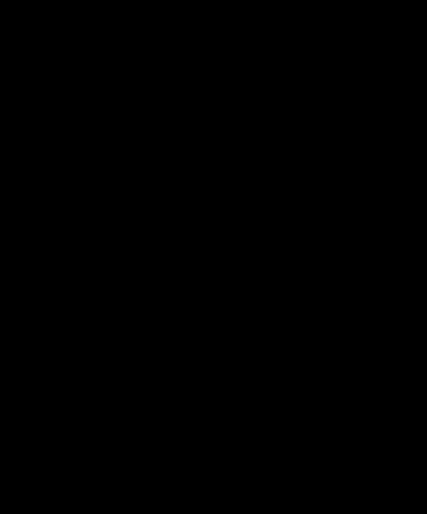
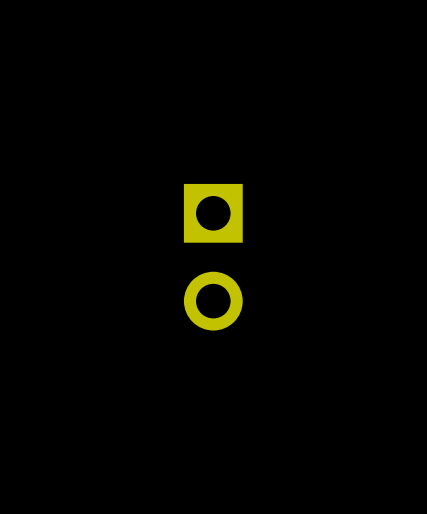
part: none -> (213, 257)

